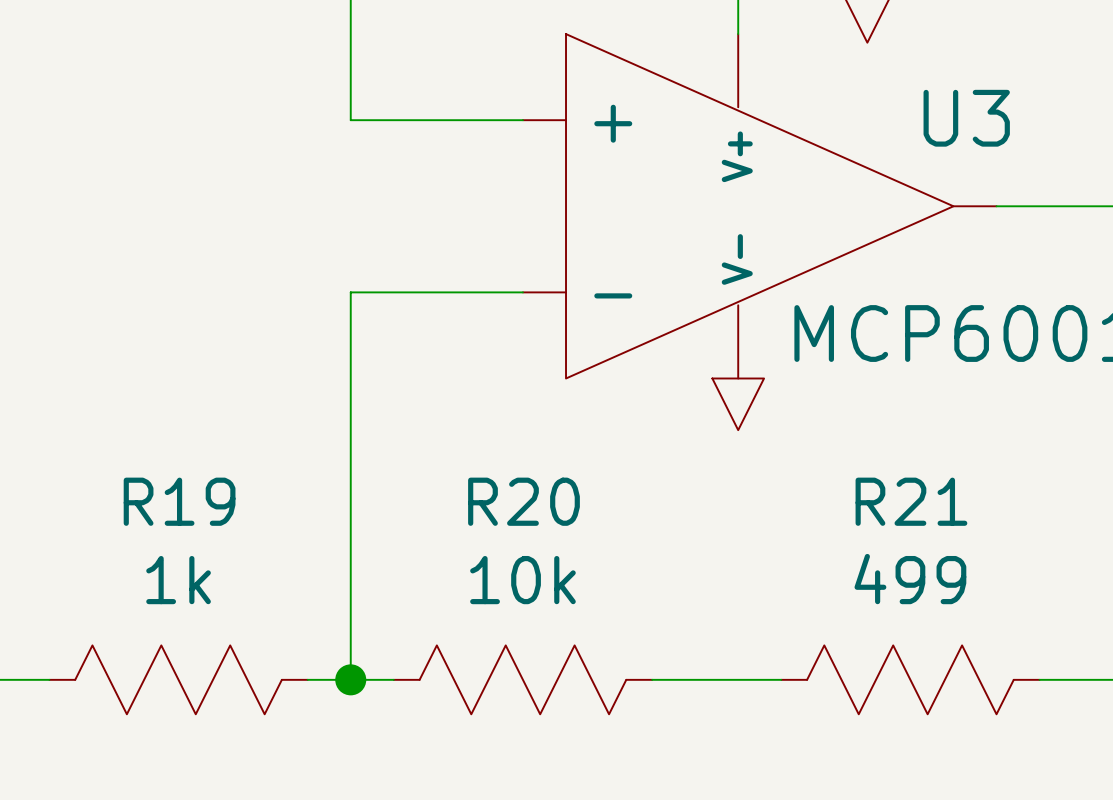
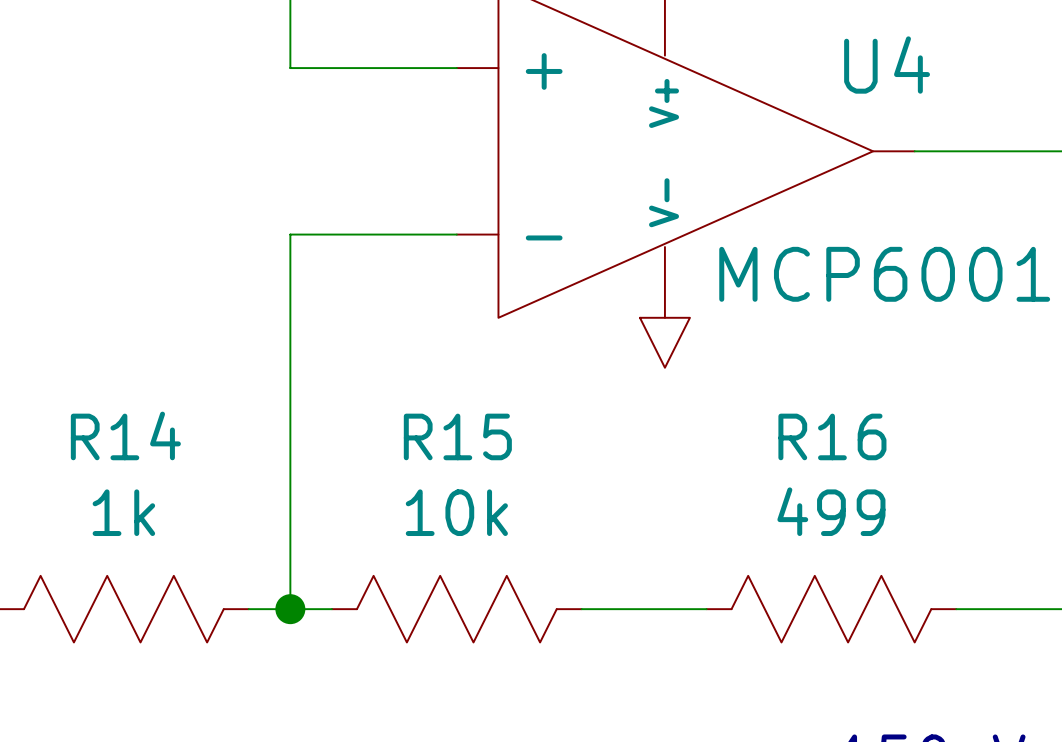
U3 name: U3 (966, 118) -> U4 (887, 65)
R19 name: R19 (179, 501) -> R14 (125, 435)
R20 name: R20 (523, 501) -> R15 (457, 436)
R21 name: R21 (911, 501) -> R16 (832, 436)

